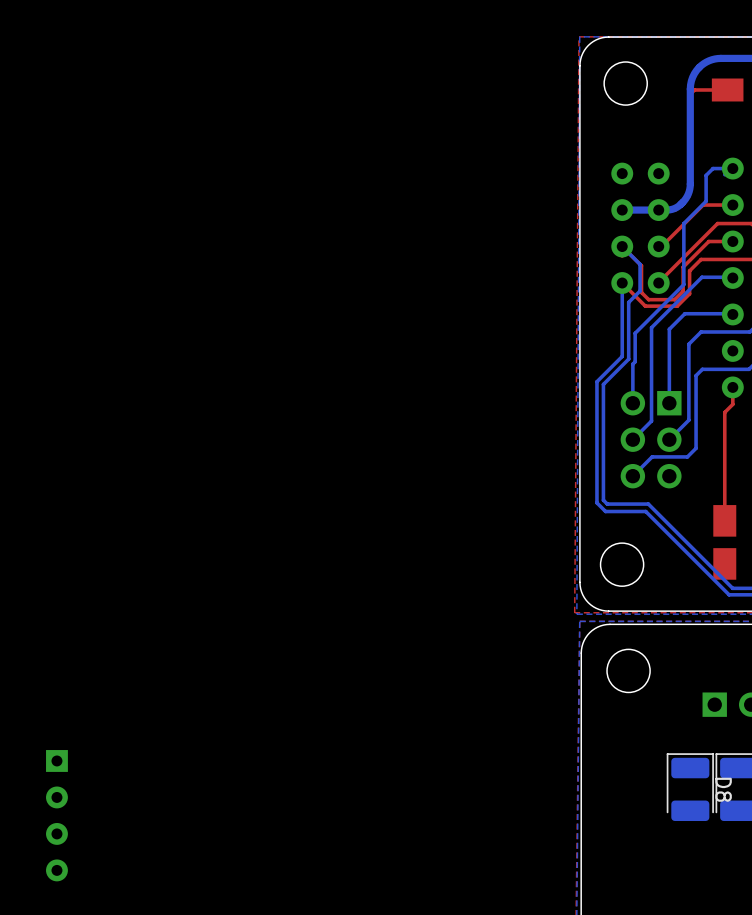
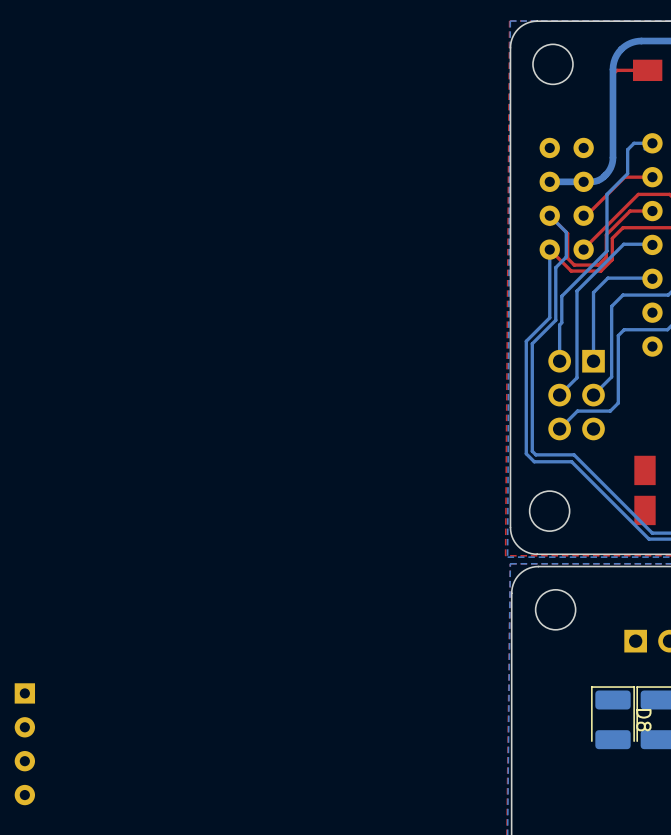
top track: (732, 387) (732, 404) (724, 412) (724, 520) -> none

